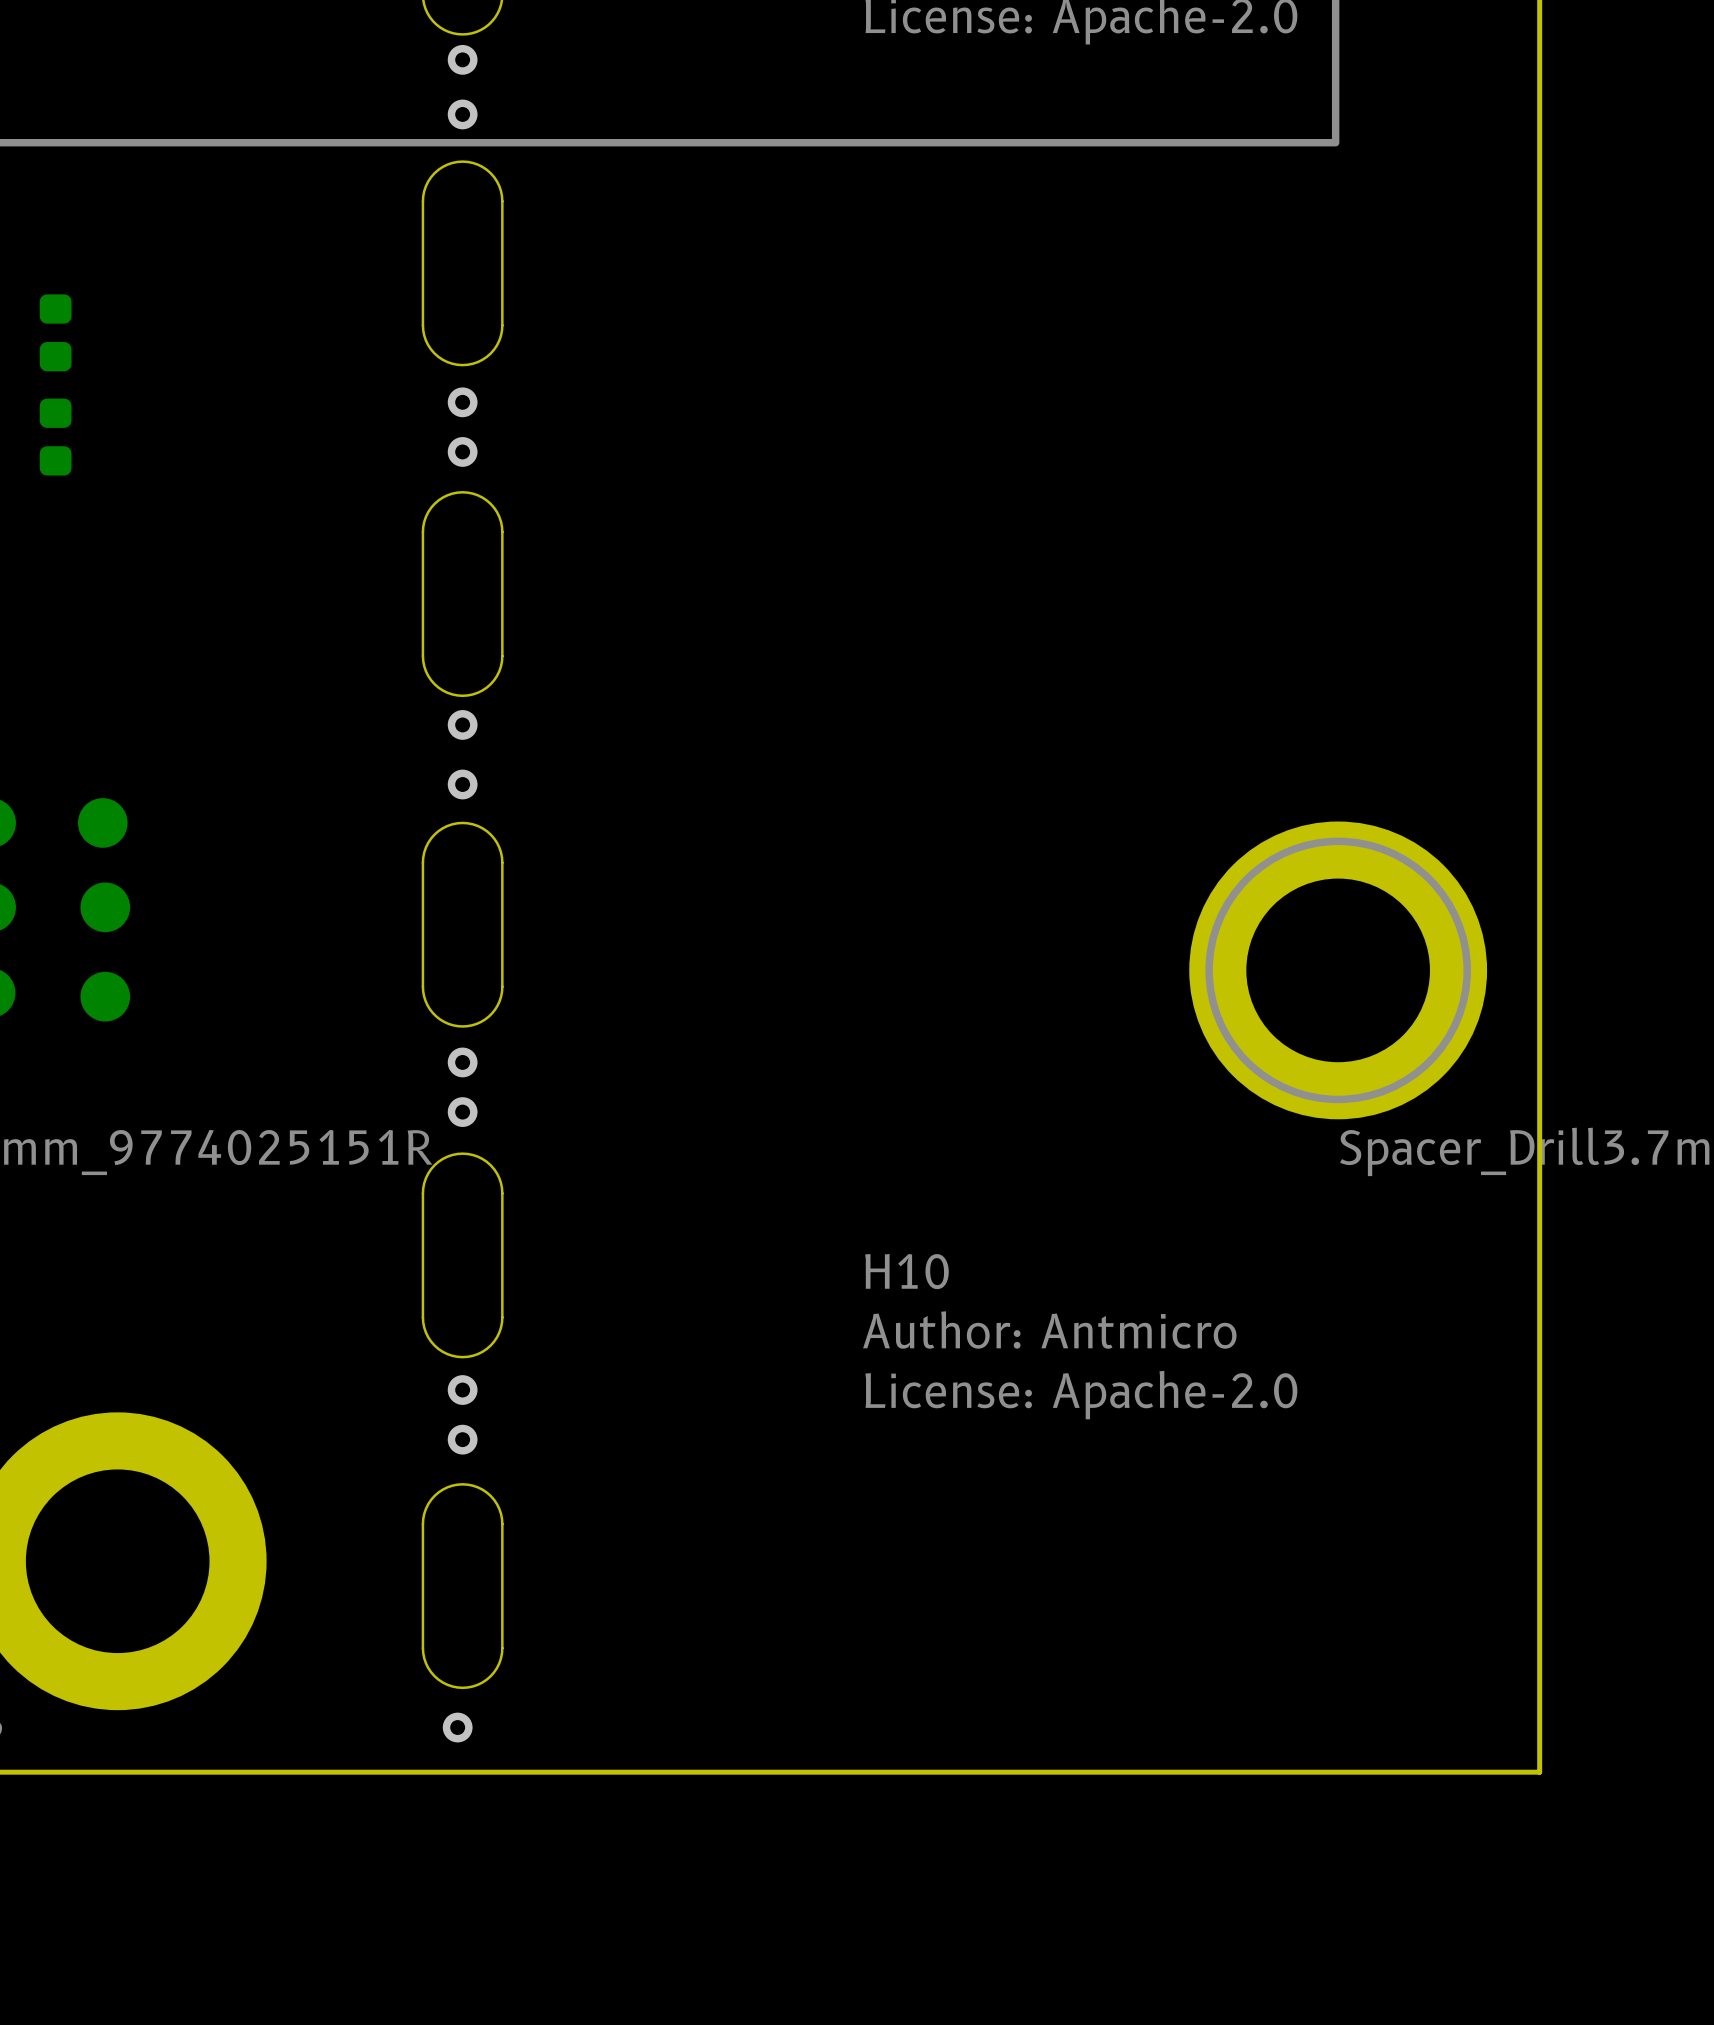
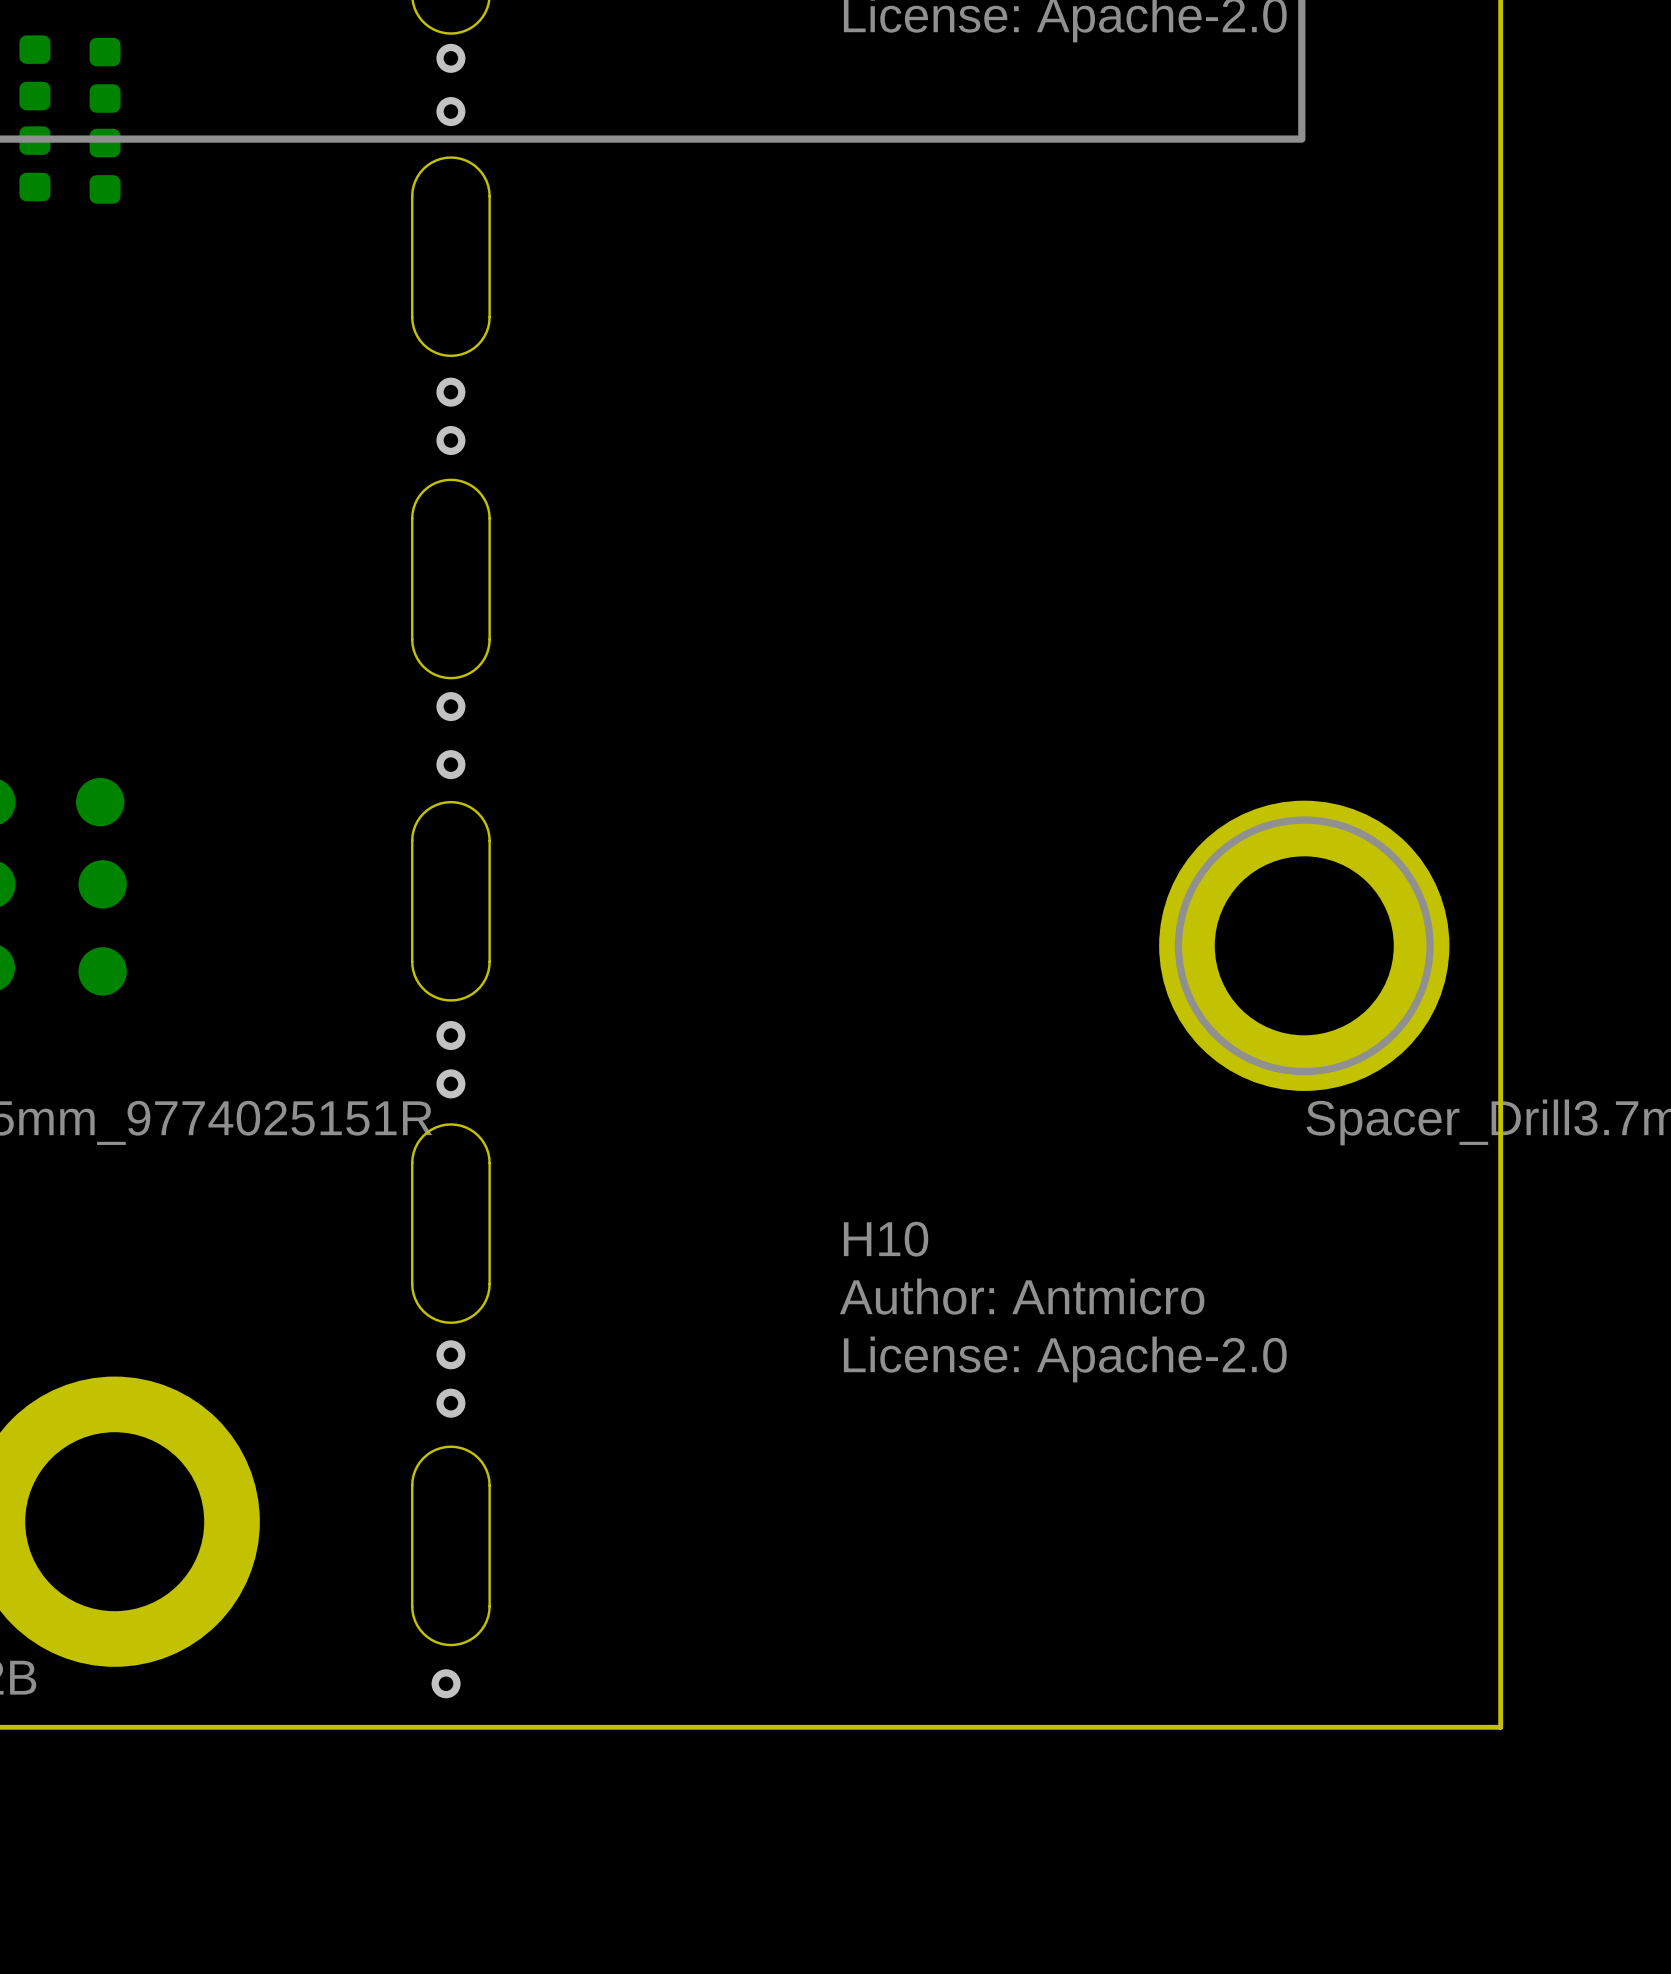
part: none -> (34, 72)
part: none -> (105, 75)
part: none -> (34, 163)
part: none -> (105, 166)
part: (55, 332) -> none
part: (55, 437) -> none

